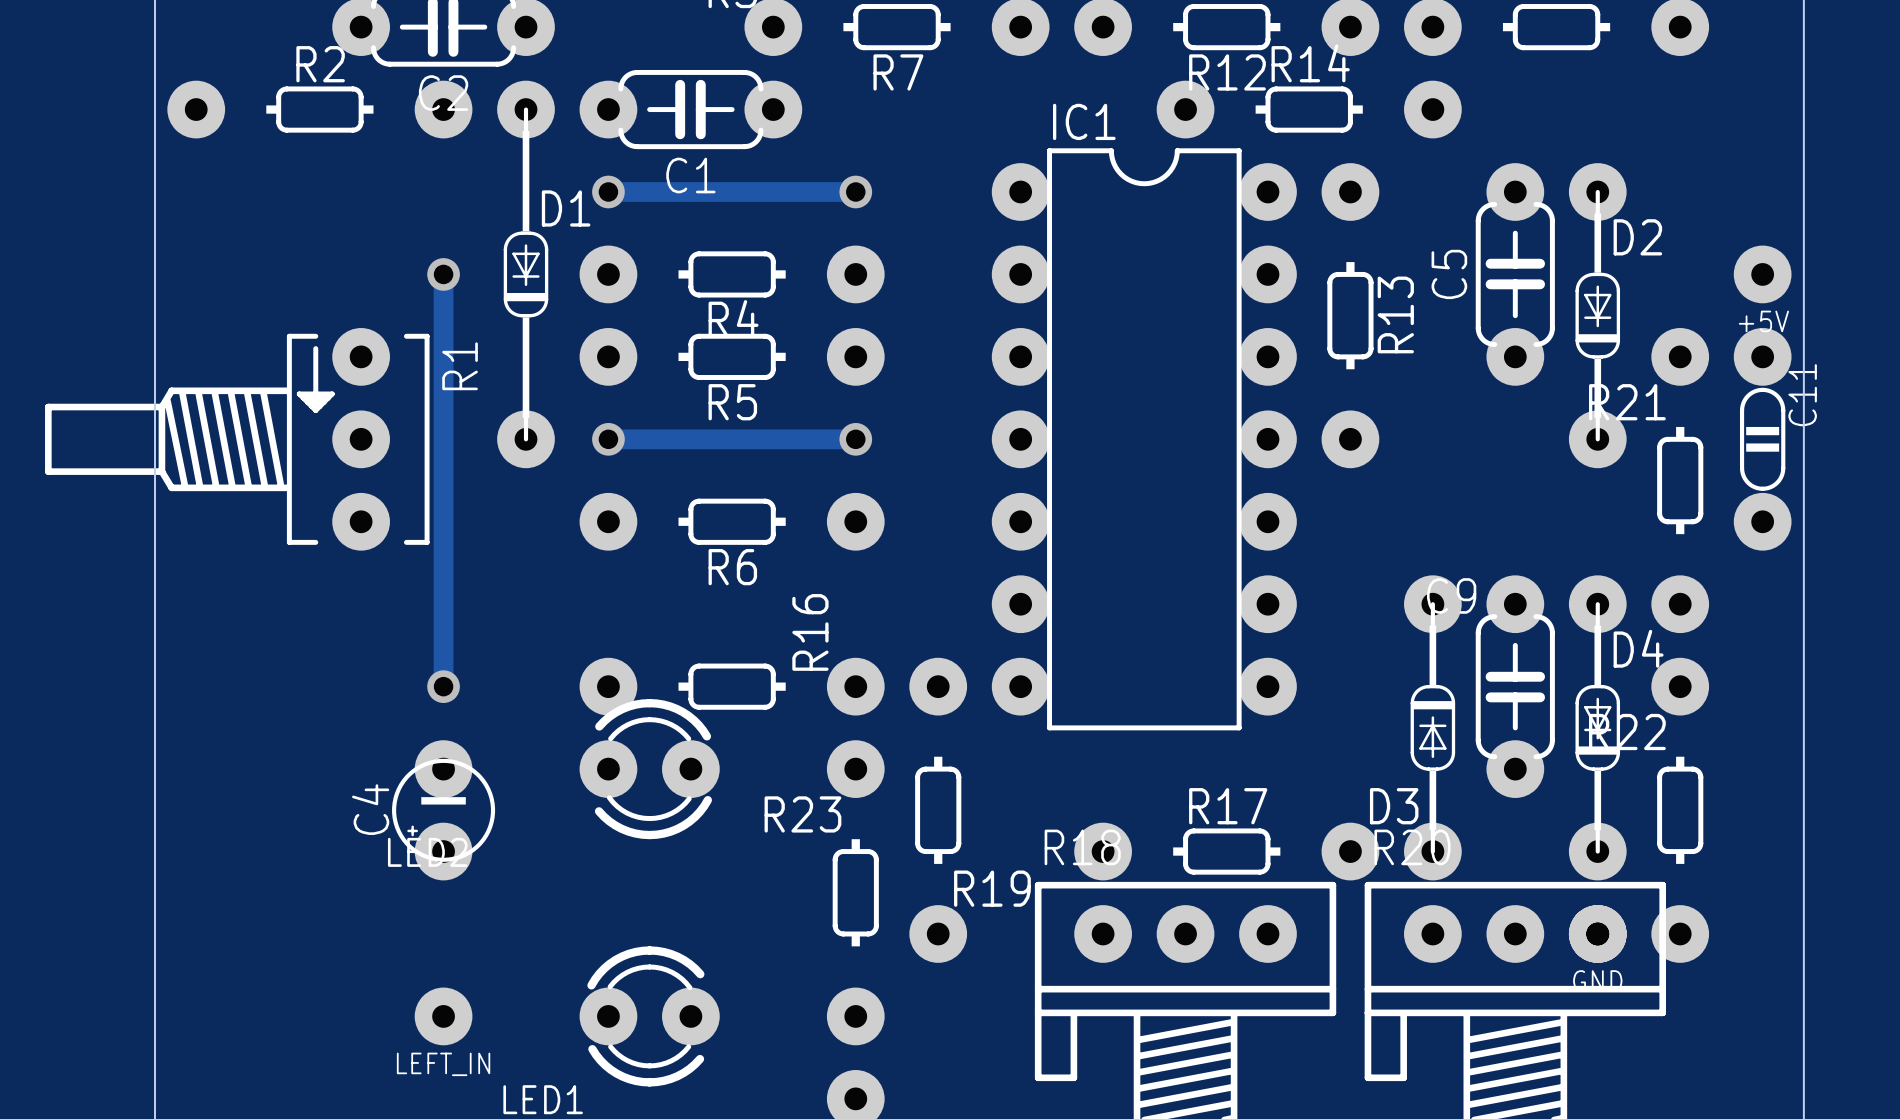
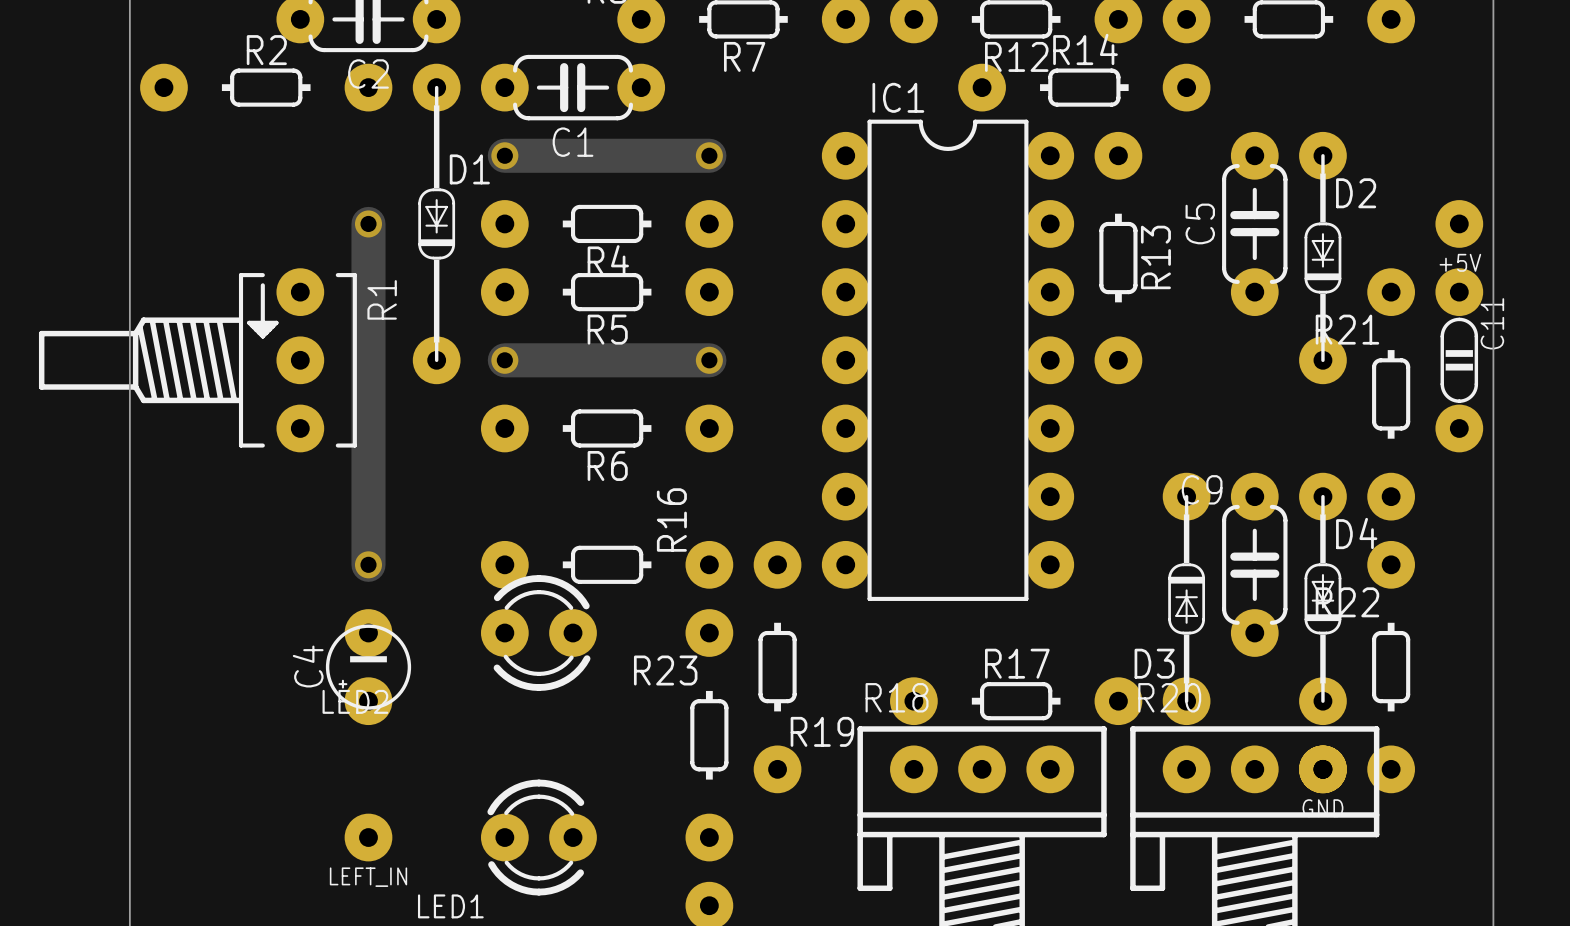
track width: thin (608, 192) (855, 192) -> thick (504, 155) (709, 155)
track width: thin (443, 274) (443, 686) -> thick (368, 223) (368, 564)
track width: thin (608, 439) (855, 439) -> thick (504, 360) (709, 360)

